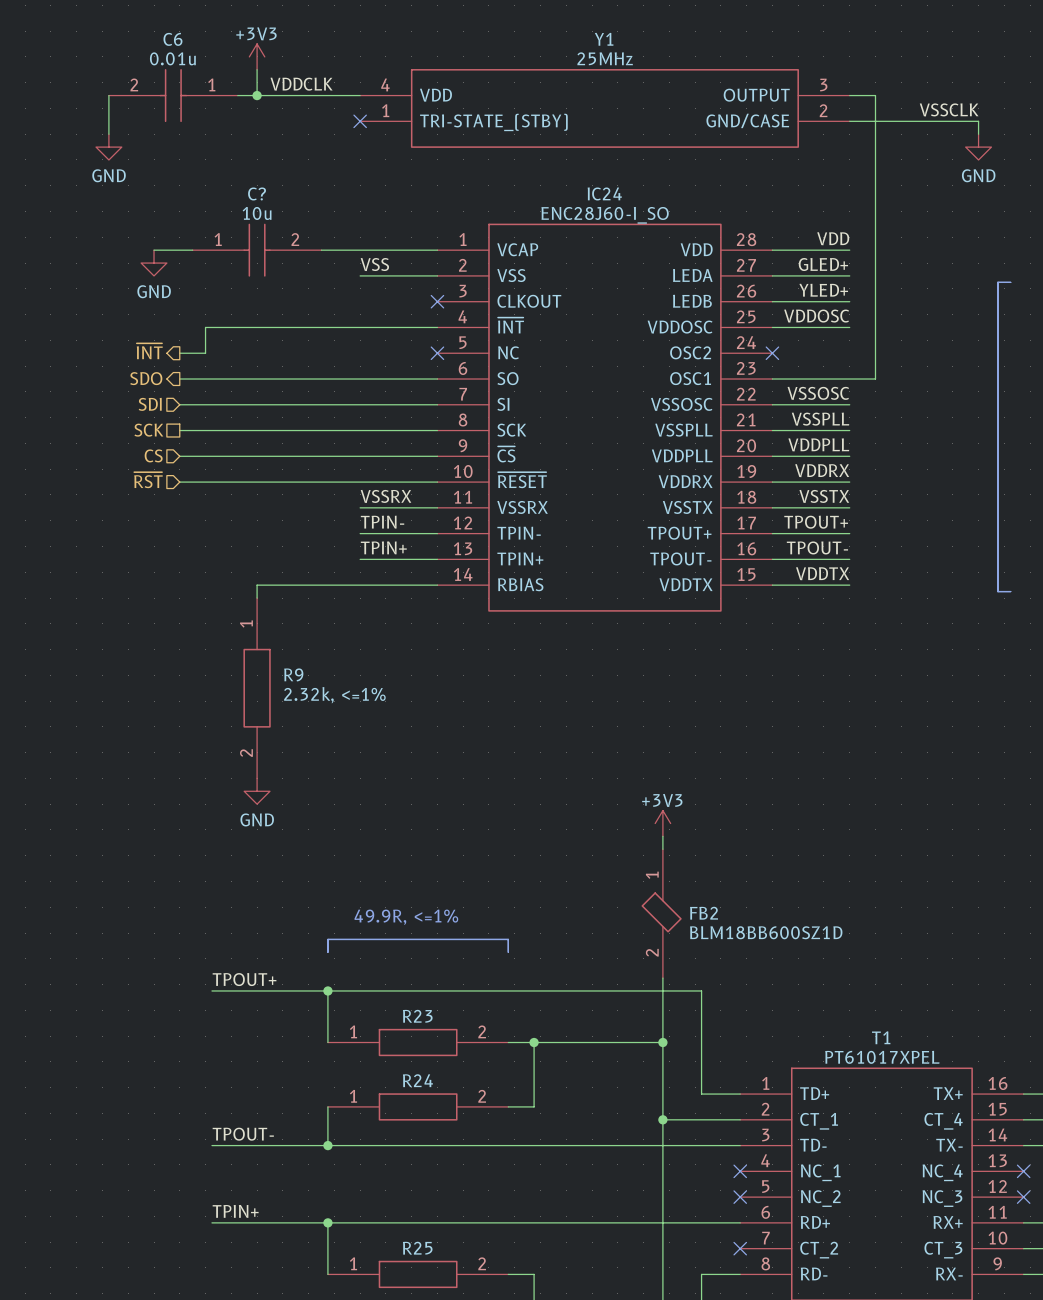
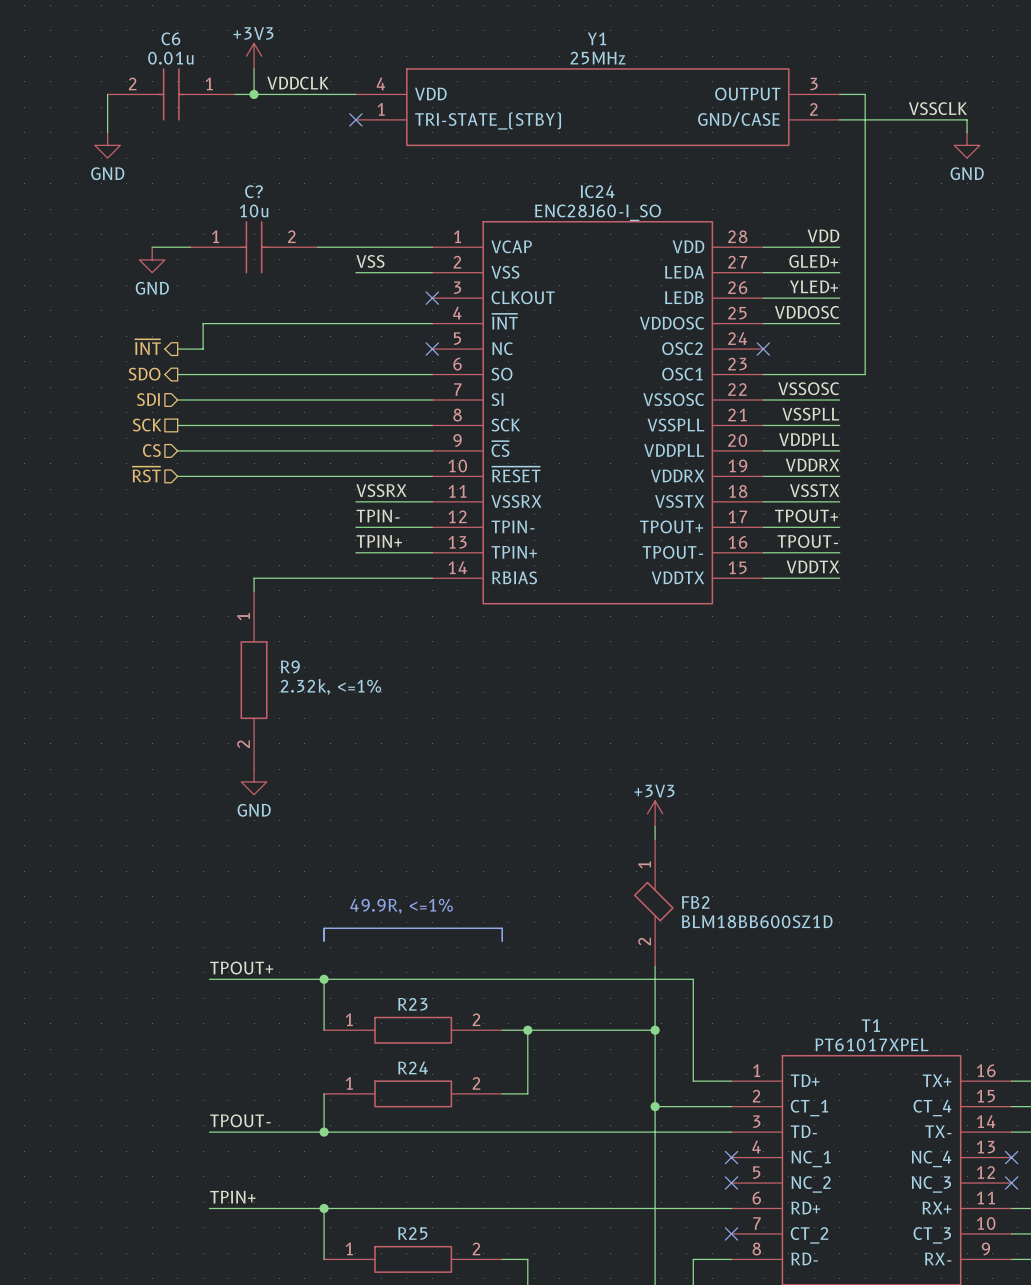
line: (1010, 282) (997, 282) (997, 591) (1010, 591) -> none

